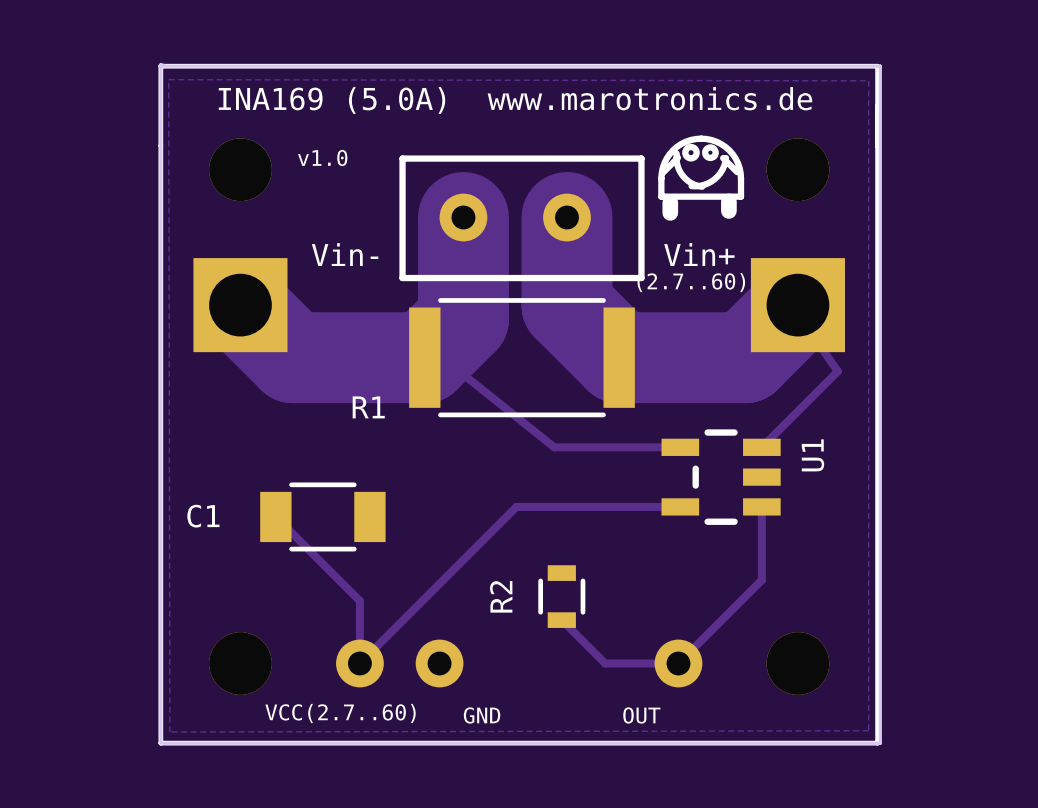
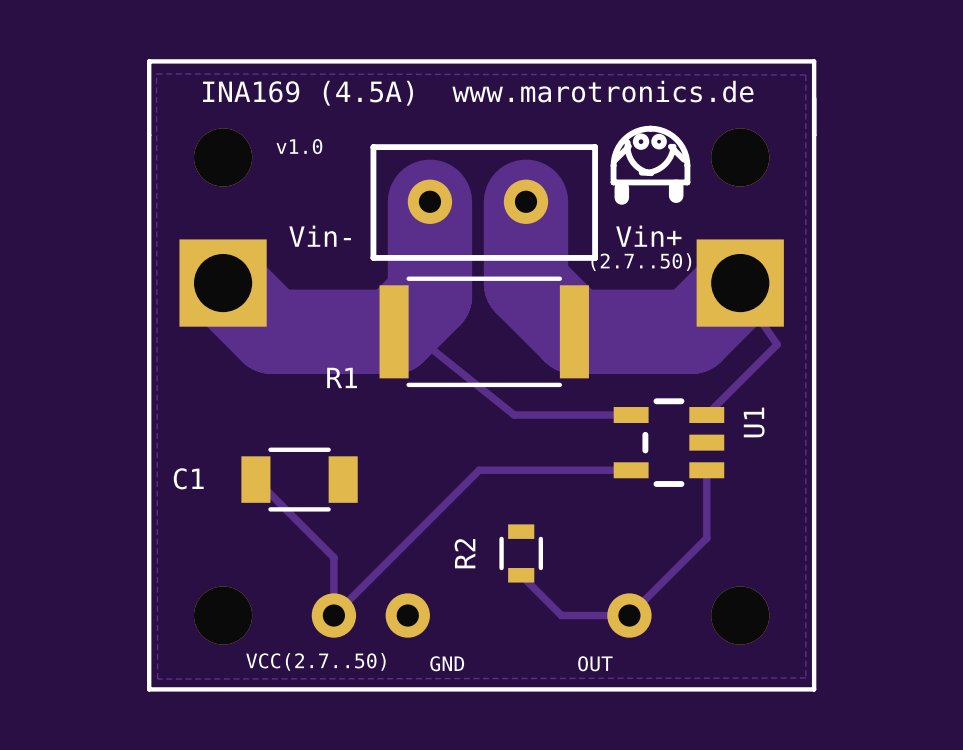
board edge: (160, 64) (160, 743) -> none
board edge: (160, 66) (880, 66) (880, 743) (163, 743) -> none
part value: INA169 (5.0A) www.marotronics.de (515, 100) -> INA169 (4.5A) www.marotronics.de (478, 93)
text: (2.7..60) (691, 282) -> (2.7..50) (641, 262)
text: VCC(2.7..60) (340, 713) -> VCC(2.7..50) (315, 661)

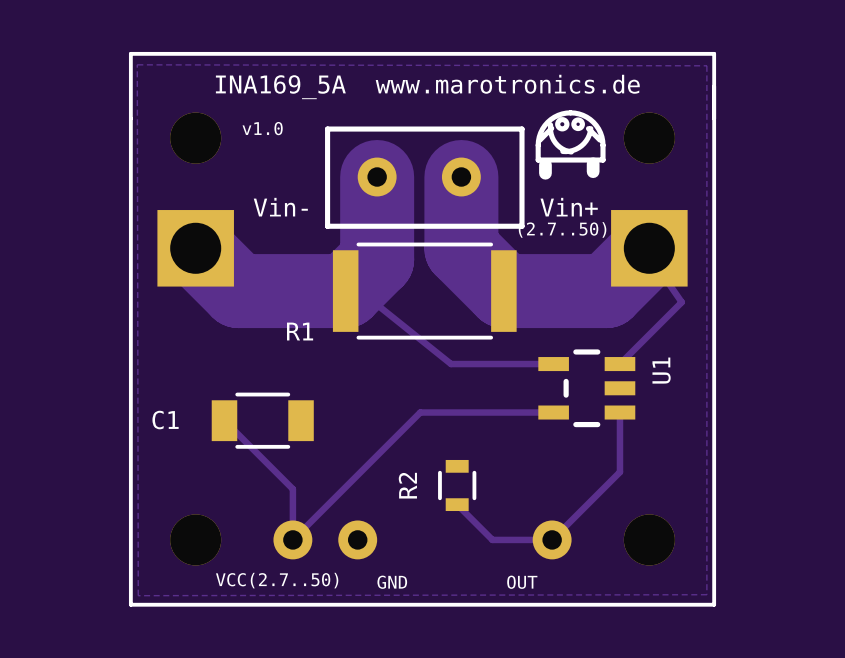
part value: INA169 (4.5A) www.marotronics.de (478, 93) -> INA169_5A www.marotronics.de (427, 86)

